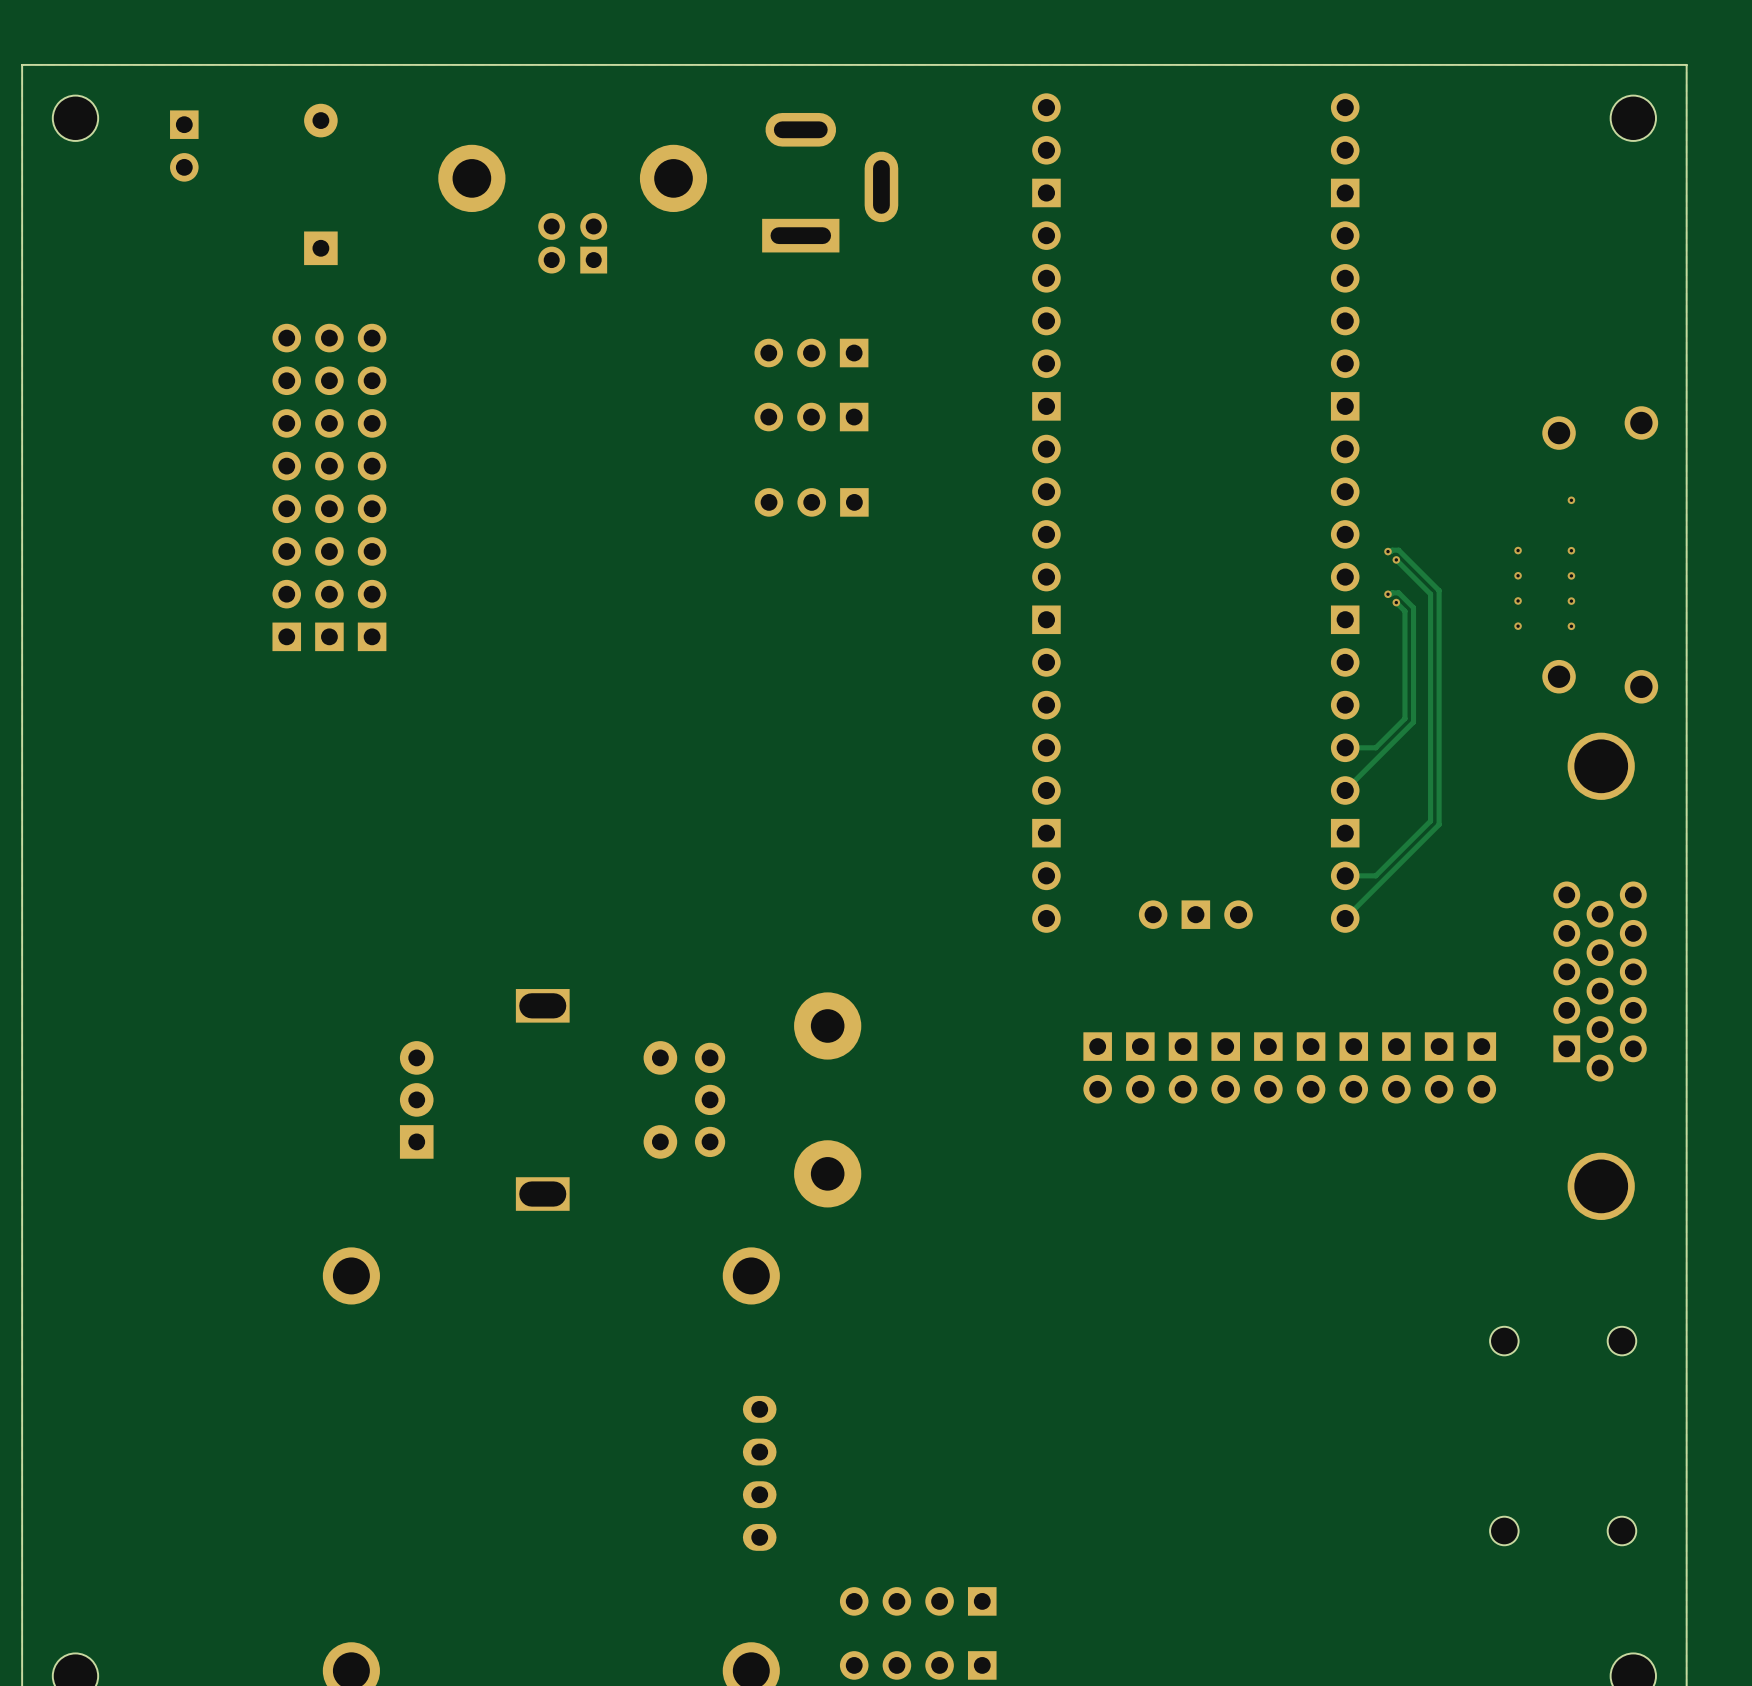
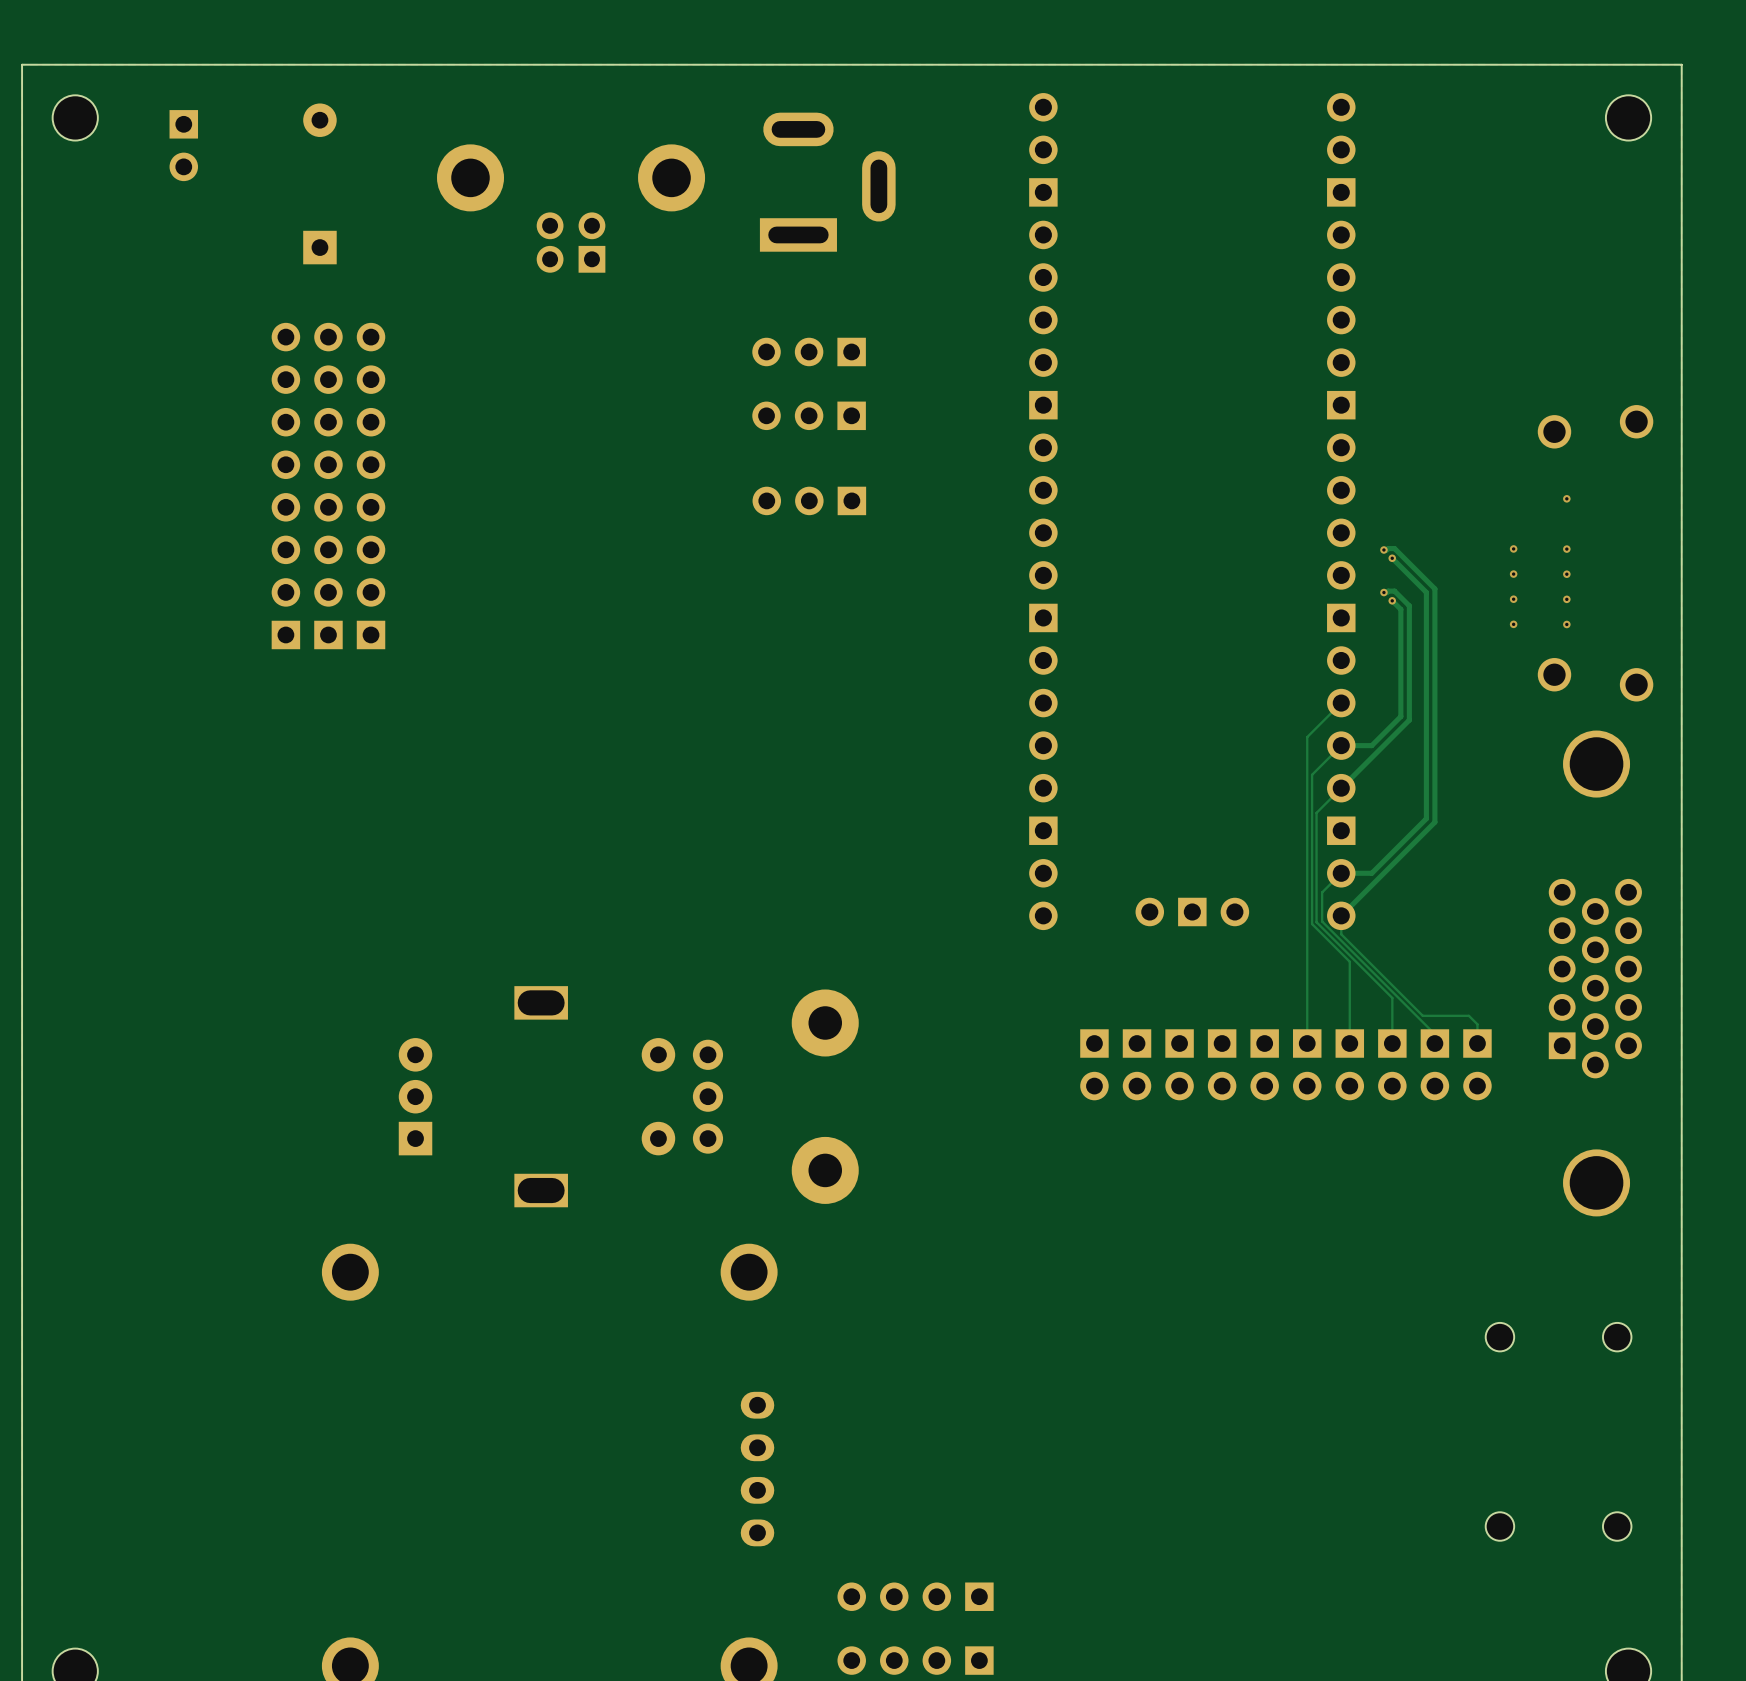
track: none -> (1341, 703) (1307, 737) (1307, 1043)
track: none -> (1341, 745) (1312, 774) (1312, 924) (1349, 961) (1349, 1043)
track: none -> (1341, 788) (1316, 812) (1316, 922) (1392, 998) (1392, 1043)
track: none -> (1341, 873) (1322, 892) (1322, 921) (1434, 1034) (1434, 1043)
track: none -> (1341, 915) (1341, 934) (1422, 1015) (1468, 1015) (1477, 1024) (1477, 1043)

